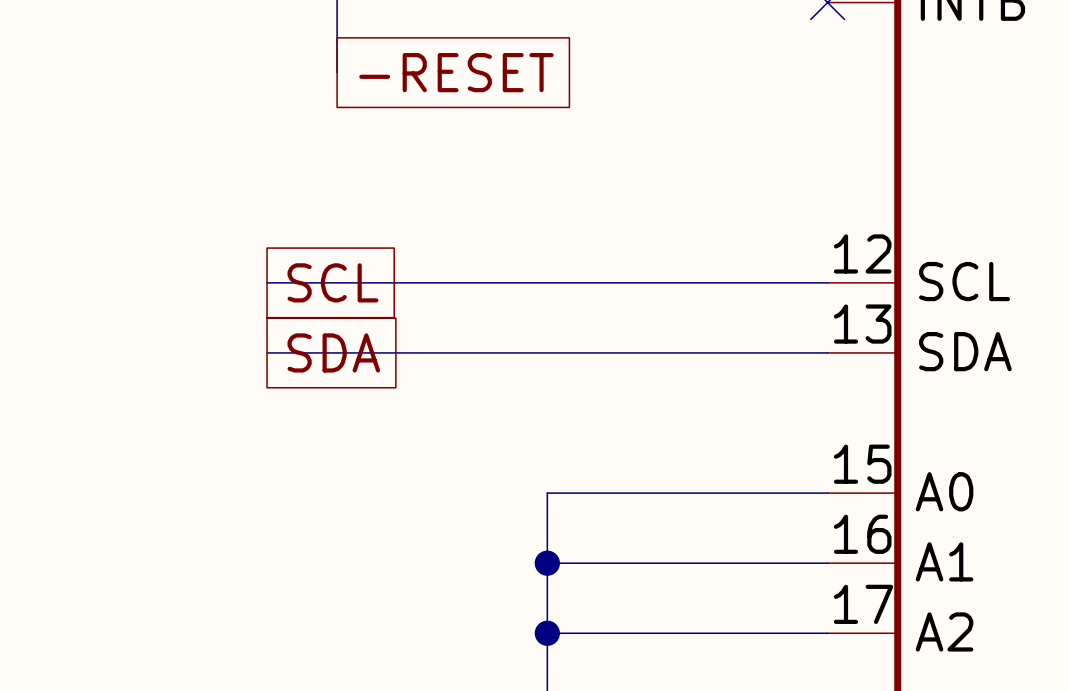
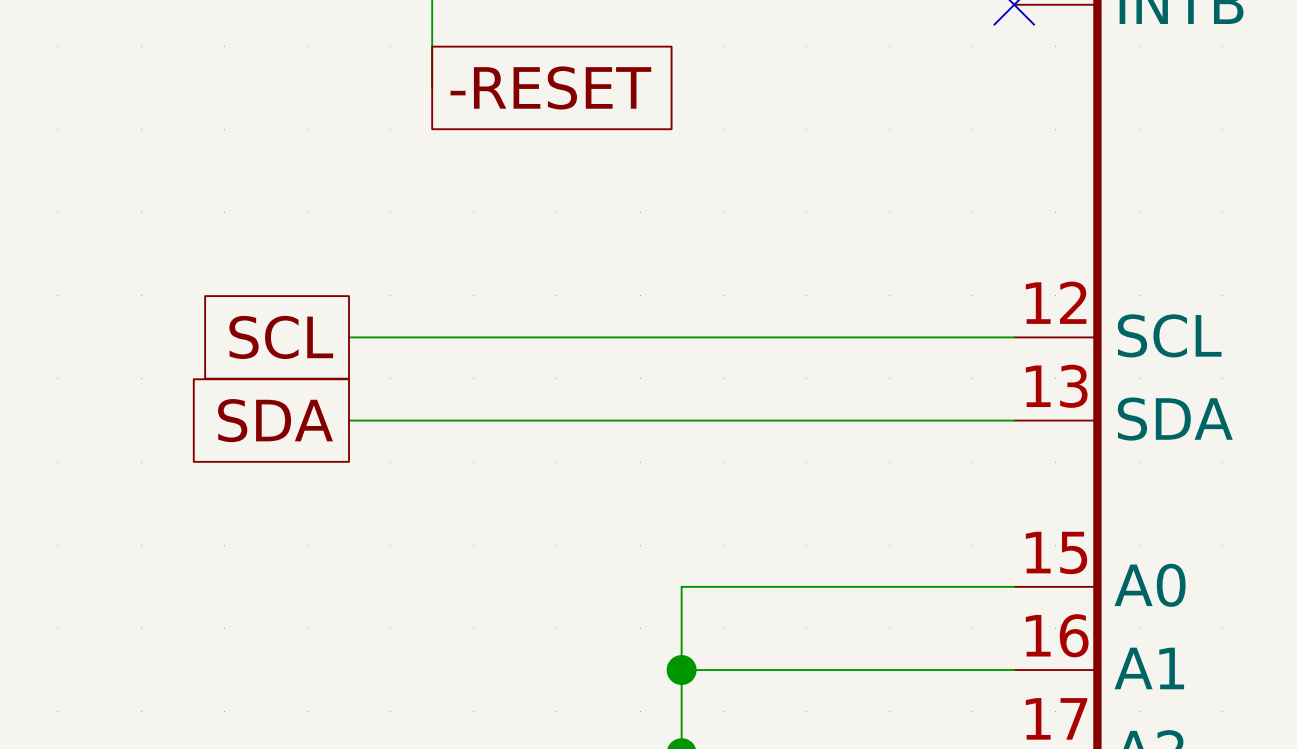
global label rotation: 0° (332, 282) -> 180° (281, 337)
global label position: SCL (332, 282) -> SCL (281, 337)
global label rotation: 0° (333, 352) -> 180° (275, 420)

